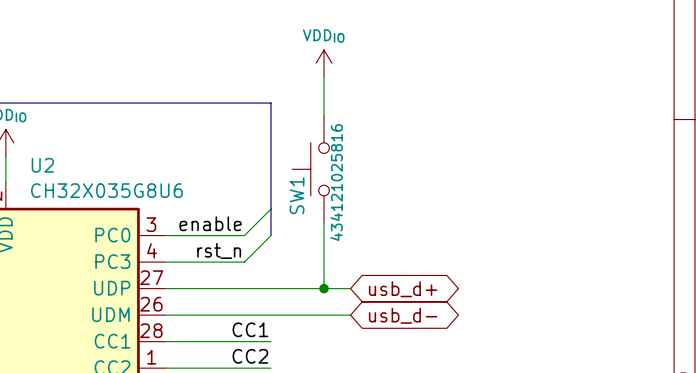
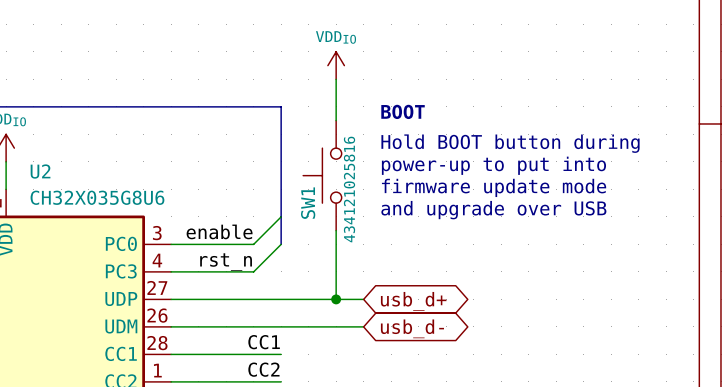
text: none -> BOOT (403, 111)
text: none -> Hold BOOT button during (510, 143)
text: none -> power-up to put into (493, 165)
text: none -> firmware update mode (494, 187)
text: none -> and upgrade over USB (493, 210)

